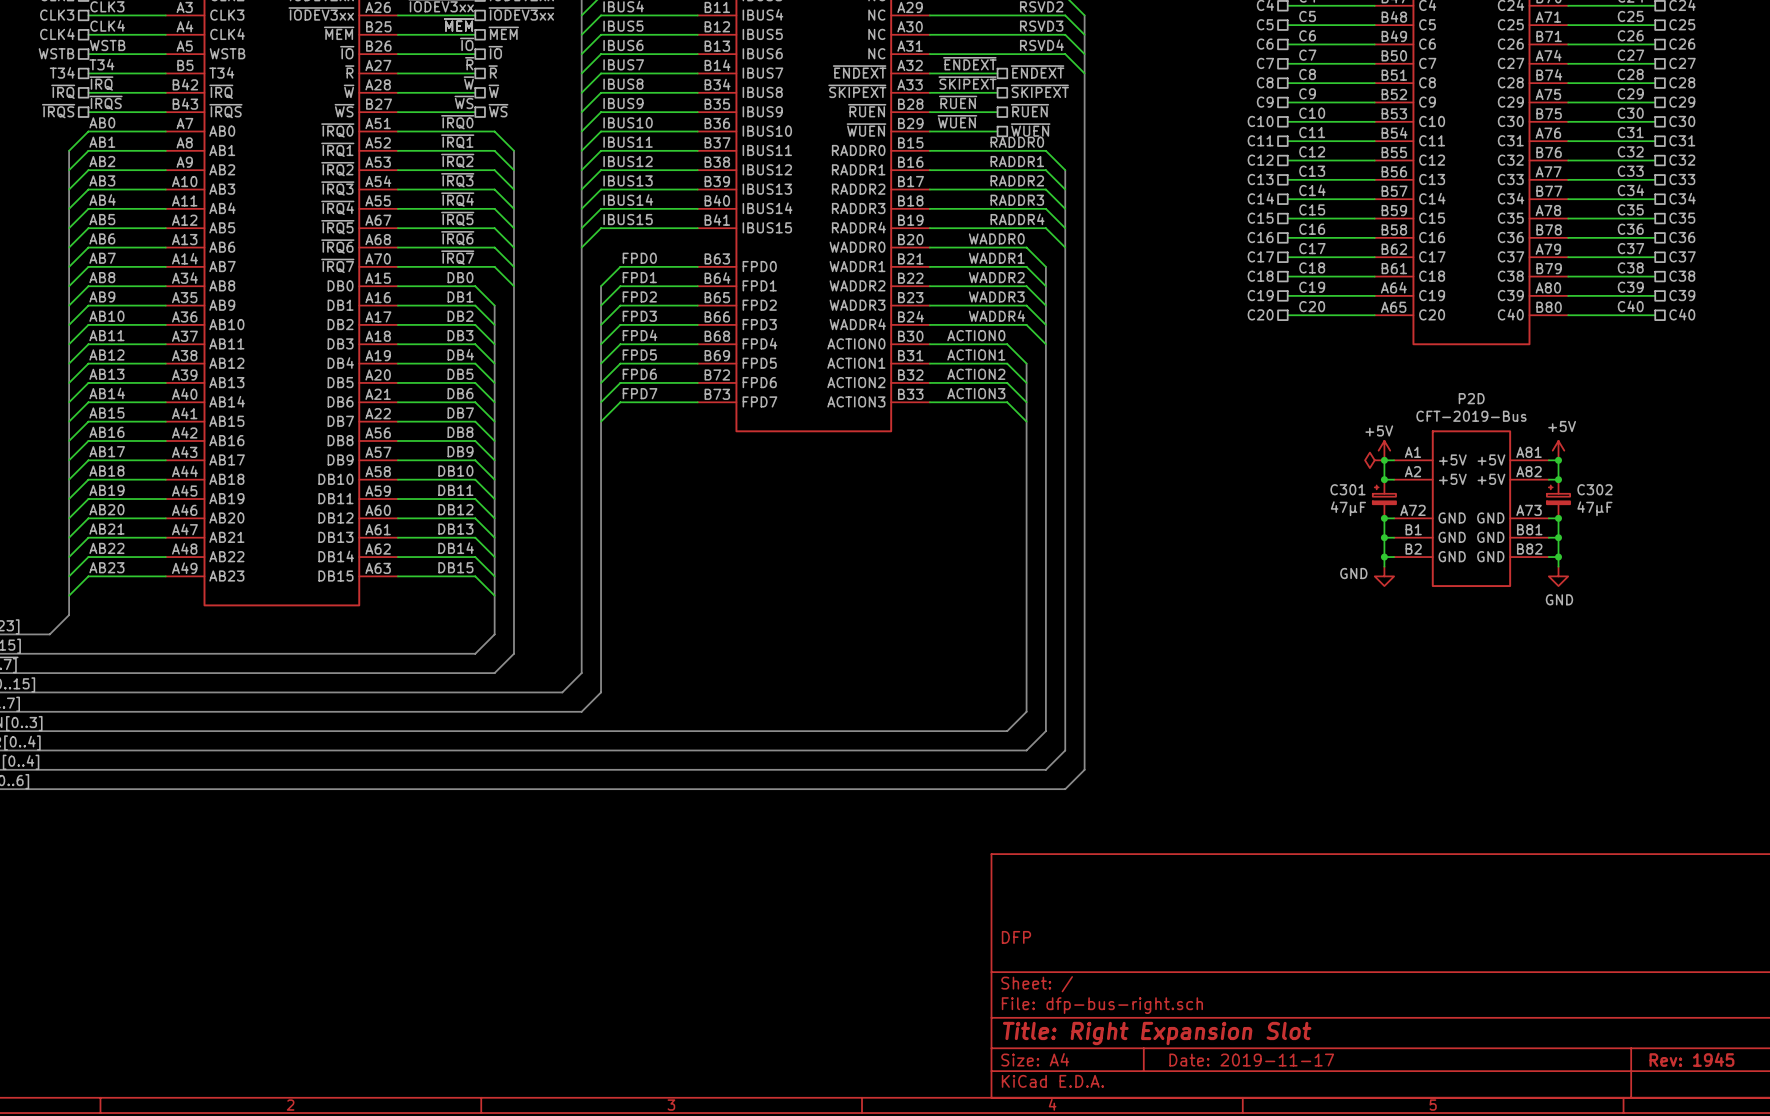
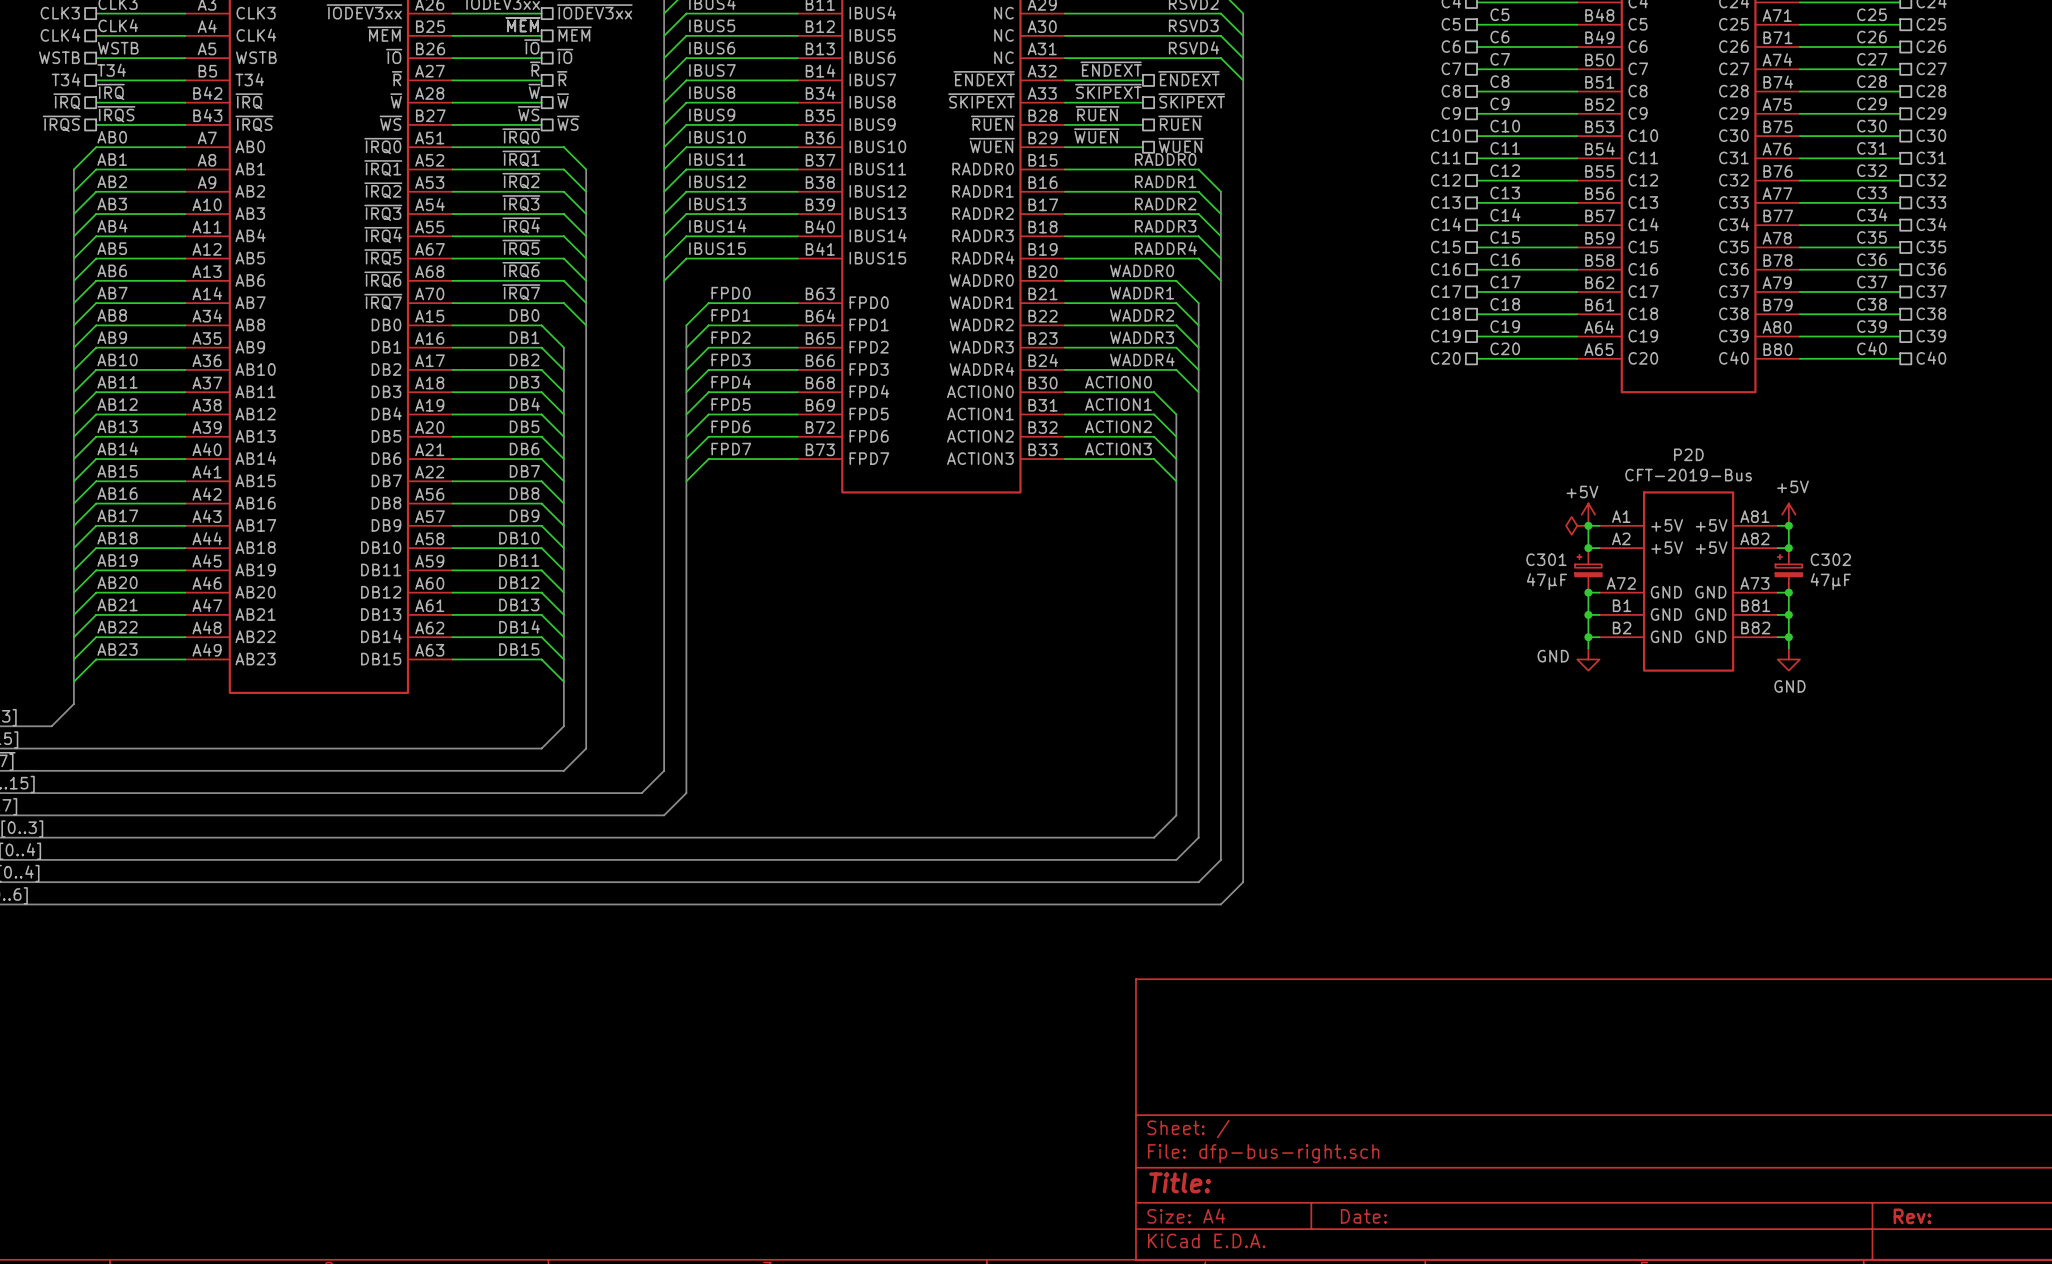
title block: DFP (1016, 937) -> none
title block: Title: Right Expansion Slot (1157, 1033) -> Title: (1180, 1182)
title block: Rev: 1945 (1691, 1059) -> Rev: (1912, 1216)
title block: Date: 2019-11-17 (1251, 1060) -> Date: (1363, 1216)

